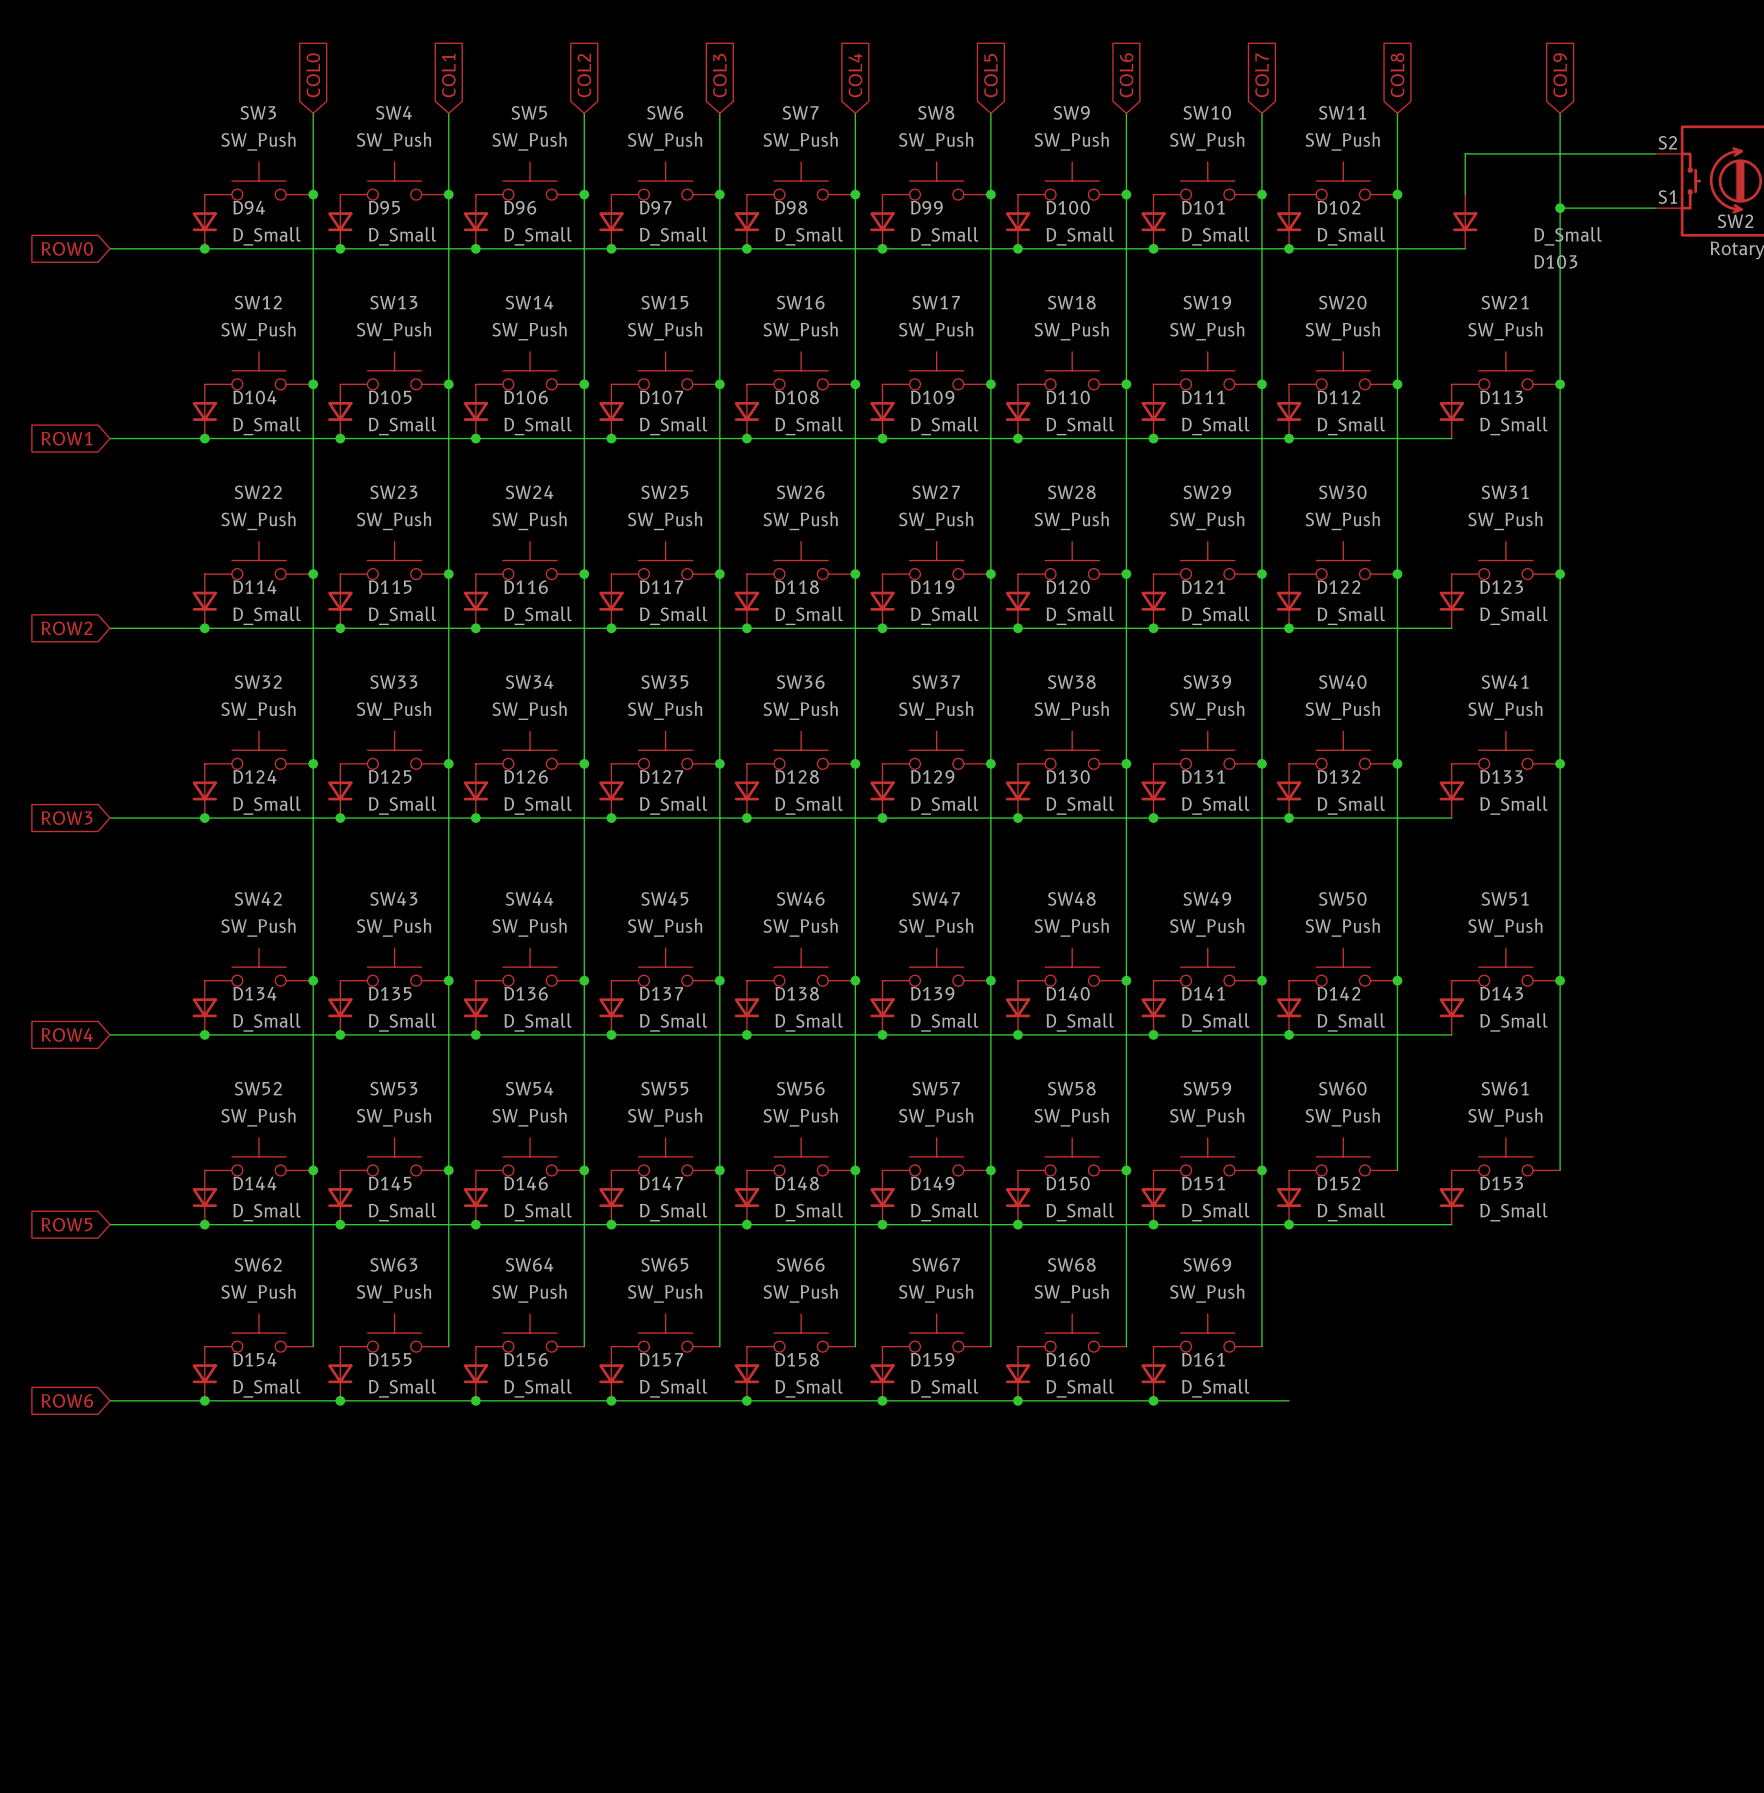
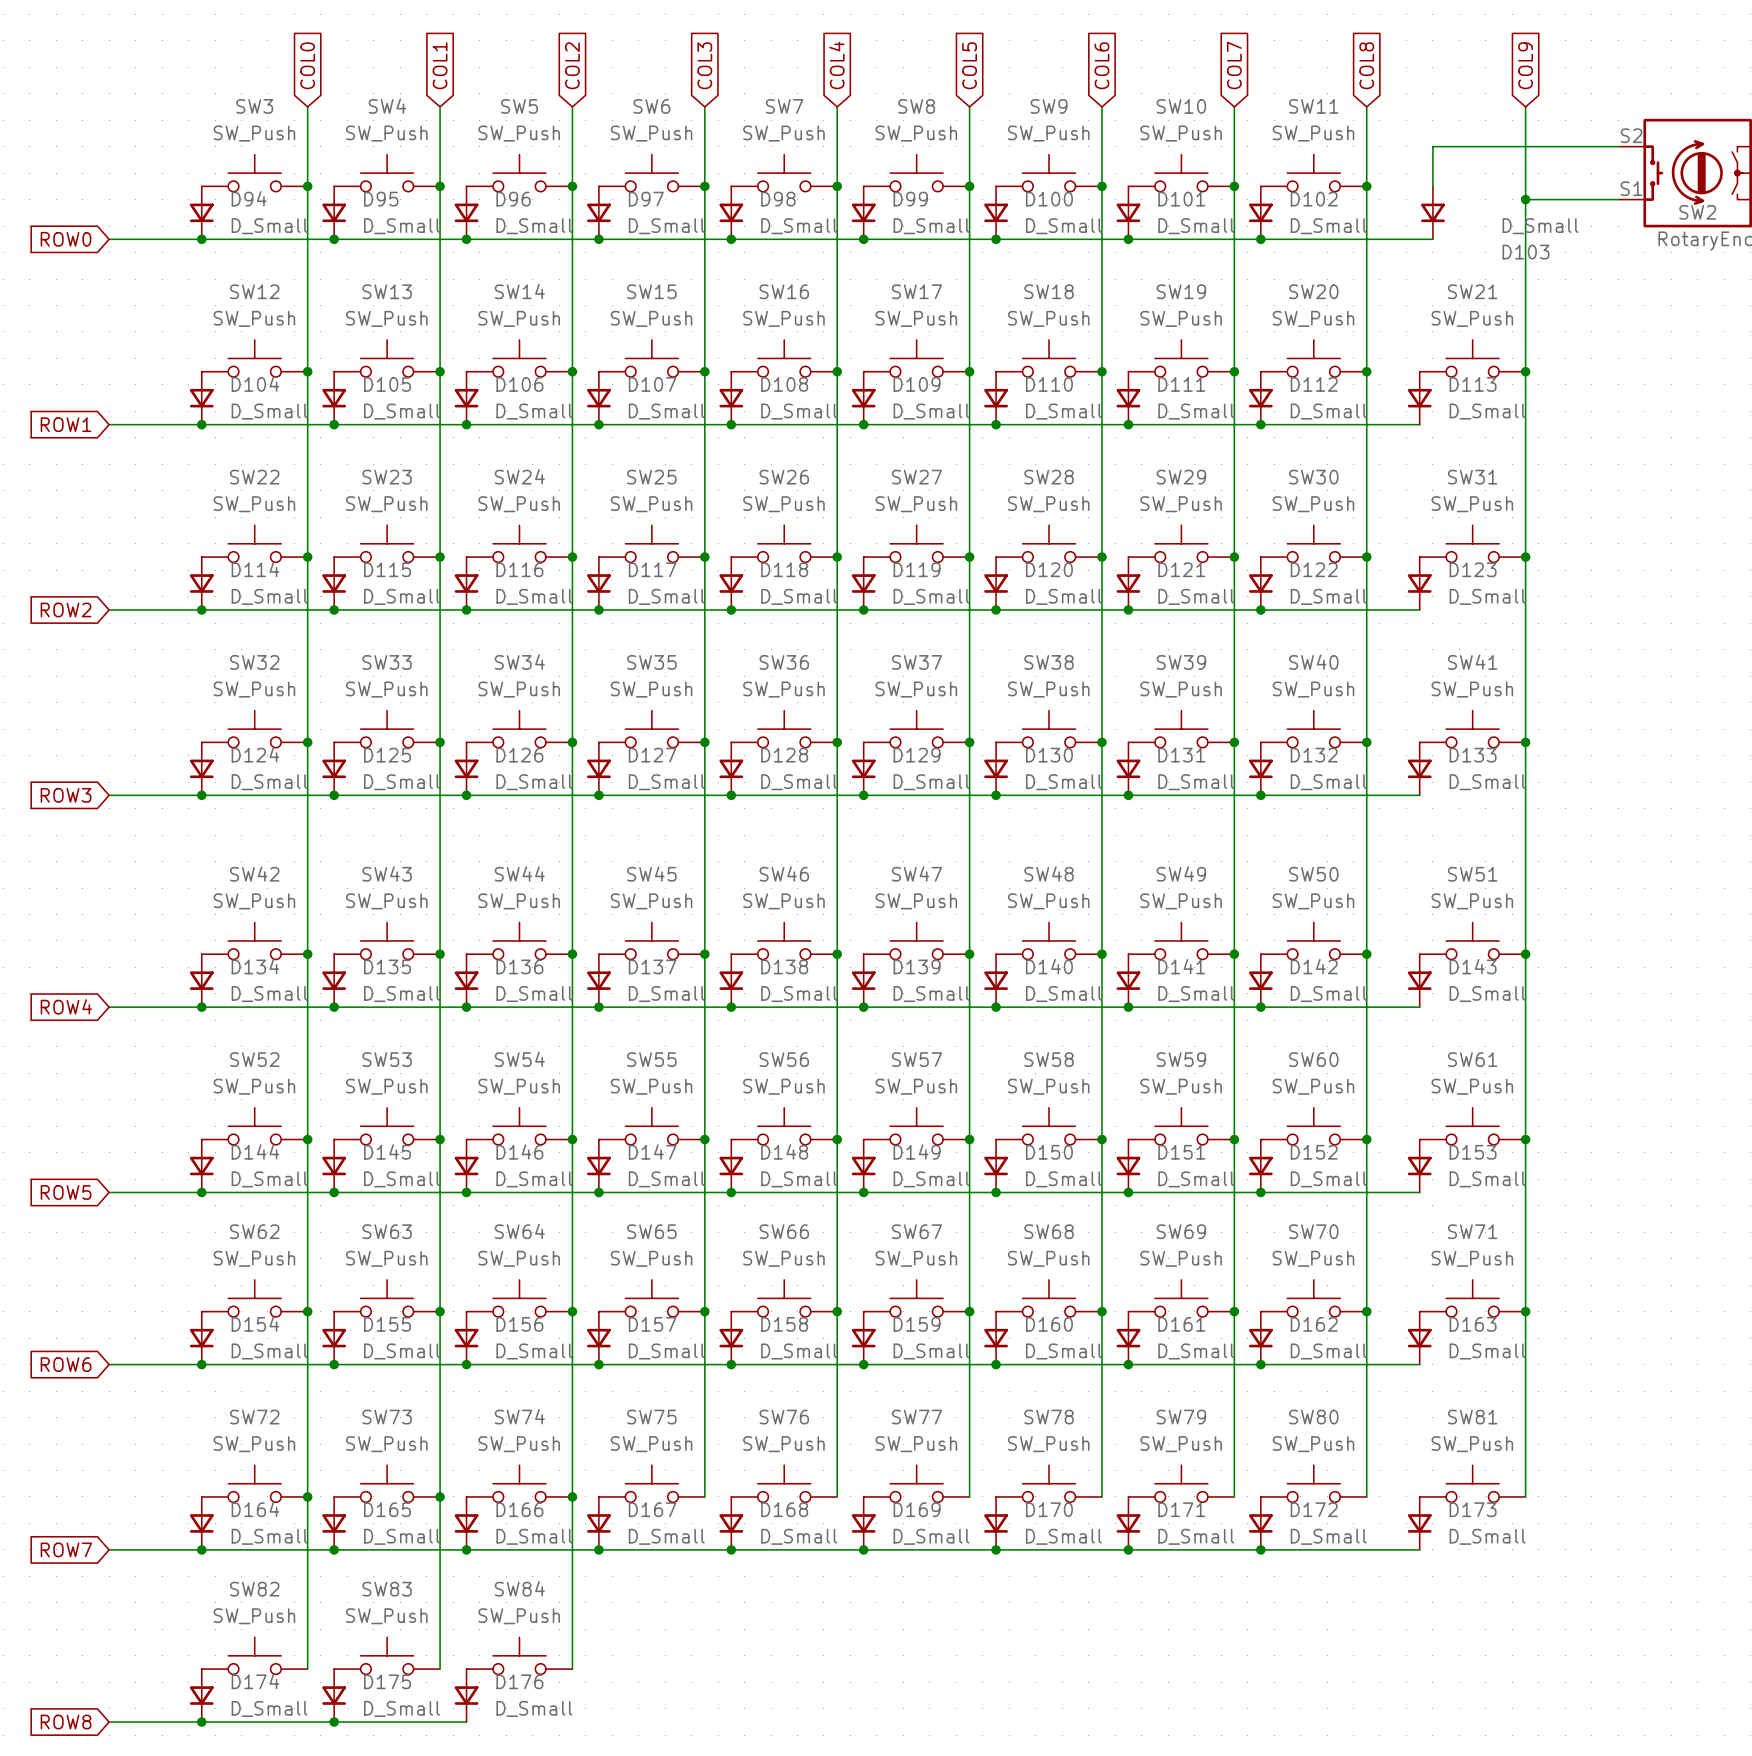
wire: none -> (1366, 1139) (1366, 1496)
junction: none -> (1366, 1139)
wire: none -> (1525, 1139) (1525, 1496)
junction: none -> (1525, 1139)
SW70: none -> SW_Push (1313, 1298)
SW71: none -> SW_Push (1472, 1298)
wire: none -> (307, 1311) (307, 1669)
junction: none -> (307, 1311)
wire: none -> (440, 1311) (440, 1669)
junction: none -> (440, 1311)
wire: none -> (572, 1311) (572, 1669)
junction: none -> (572, 1311)
wire: none -> (704, 1311) (704, 1496)
junction: none -> (704, 1311)
wire: none -> (837, 1311) (837, 1496)
junction: none -> (837, 1311)
wire: none -> (969, 1311) (969, 1496)
junction: none -> (969, 1311)
wire: none -> (1101, 1311) (1101, 1496)
junction: none -> (1101, 1311)
wire: none -> (1234, 1311) (1234, 1496)
junction: none -> (1234, 1311)
junction: none -> (1366, 1311)
junction: none -> (1525, 1311)
D162: none -> D_Small (1260, 1338)
D163: none -> D_Small (1419, 1338)
wire: none -> (1260, 1364) (1419, 1364)
junction: none -> (1260, 1364)
SW72: none -> SW_Push (254, 1483)
SW73: none -> SW_Push (387, 1483)
SW74: none -> SW_Push (519, 1483)
SW75: none -> SW_Push (651, 1483)
SW76: none -> SW_Push (784, 1483)
SW77: none -> SW_Push (916, 1483)
SW78: none -> SW_Push (1049, 1483)
SW79: none -> SW_Push (1181, 1483)
SW80: none -> SW_Push (1313, 1483)
SW81: none -> SW_Push (1472, 1483)
junction: none -> (307, 1496)
junction: none -> (440, 1496)
junction: none -> (572, 1496)
D164: none -> D_Small (201, 1523)
D165: none -> D_Small (334, 1523)
D166: none -> D_Small (466, 1523)
D167: none -> D_Small (598, 1523)
D168: none -> D_Small (731, 1523)
D169: none -> D_Small (863, 1523)
D170: none -> D_Small (996, 1523)
D171: none -> D_Small (1128, 1523)
D172: none -> D_Small (1260, 1523)
D173: none -> D_Small (1419, 1523)
global label: none -> ROW7 (66, 1549)
wire: none -> (109, 1549) (1419, 1549)
junction: none -> (201, 1549)
junction: none -> (334, 1549)
junction: none -> (466, 1549)
junction: none -> (598, 1549)
junction: none -> (731, 1549)
junction: none -> (863, 1549)
junction: none -> (996, 1549)
junction: none -> (1128, 1549)
junction: none -> (1260, 1549)
SW82: none -> SW_Push (254, 1655)
SW83: none -> SW_Push (387, 1655)
SW84: none -> SW_Push (519, 1655)
D174: none -> D_Small (201, 1695)
D175: none -> D_Small (334, 1695)
D176: none -> D_Small (466, 1695)
global label: none -> ROW8 (66, 1722)
wire: none -> (109, 1722) (466, 1722)
junction: none -> (201, 1722)
junction: none -> (334, 1722)

